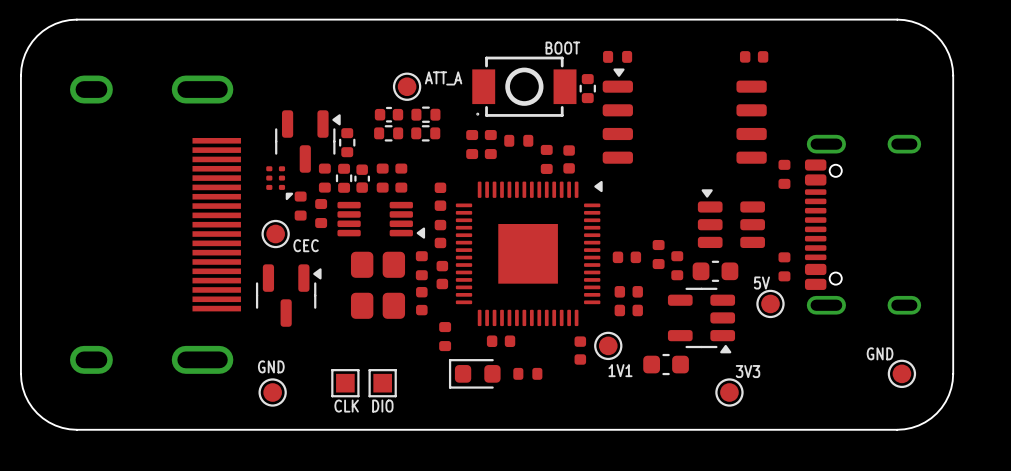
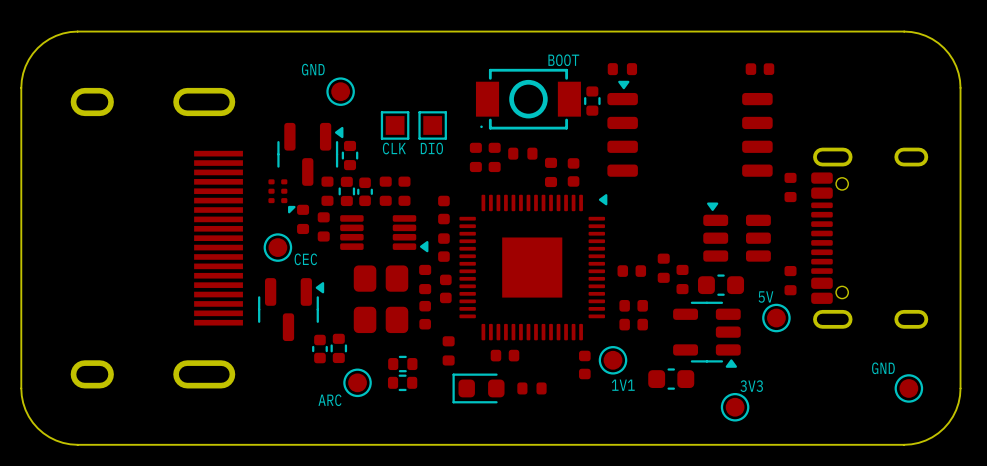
text: ATT_A (443, 78) -> none
part position: (407, 86) -> (340, 91)
part footprint: [374, 106, 404, 123] -> [380, 111, 410, 140]
part footprint: [411, 106, 441, 123] -> [418, 111, 447, 140]
part: (388, 133) -> none
part: (425, 133) -> none
part: none -> (319, 349)
part: none -> (338, 348)
part: none -> (402, 364)
text position: GND (271, 366) -> GND (313, 69)
part: none -> (402, 382)
part: (345, 383) -> none
part: (382, 383) -> none
text: none -> ARC (329, 400)
part position: (272, 392) -> (357, 382)
text position: CLK (346, 406) -> CLK (394, 148)
text position: DIO (382, 406) -> DIO (431, 148)

